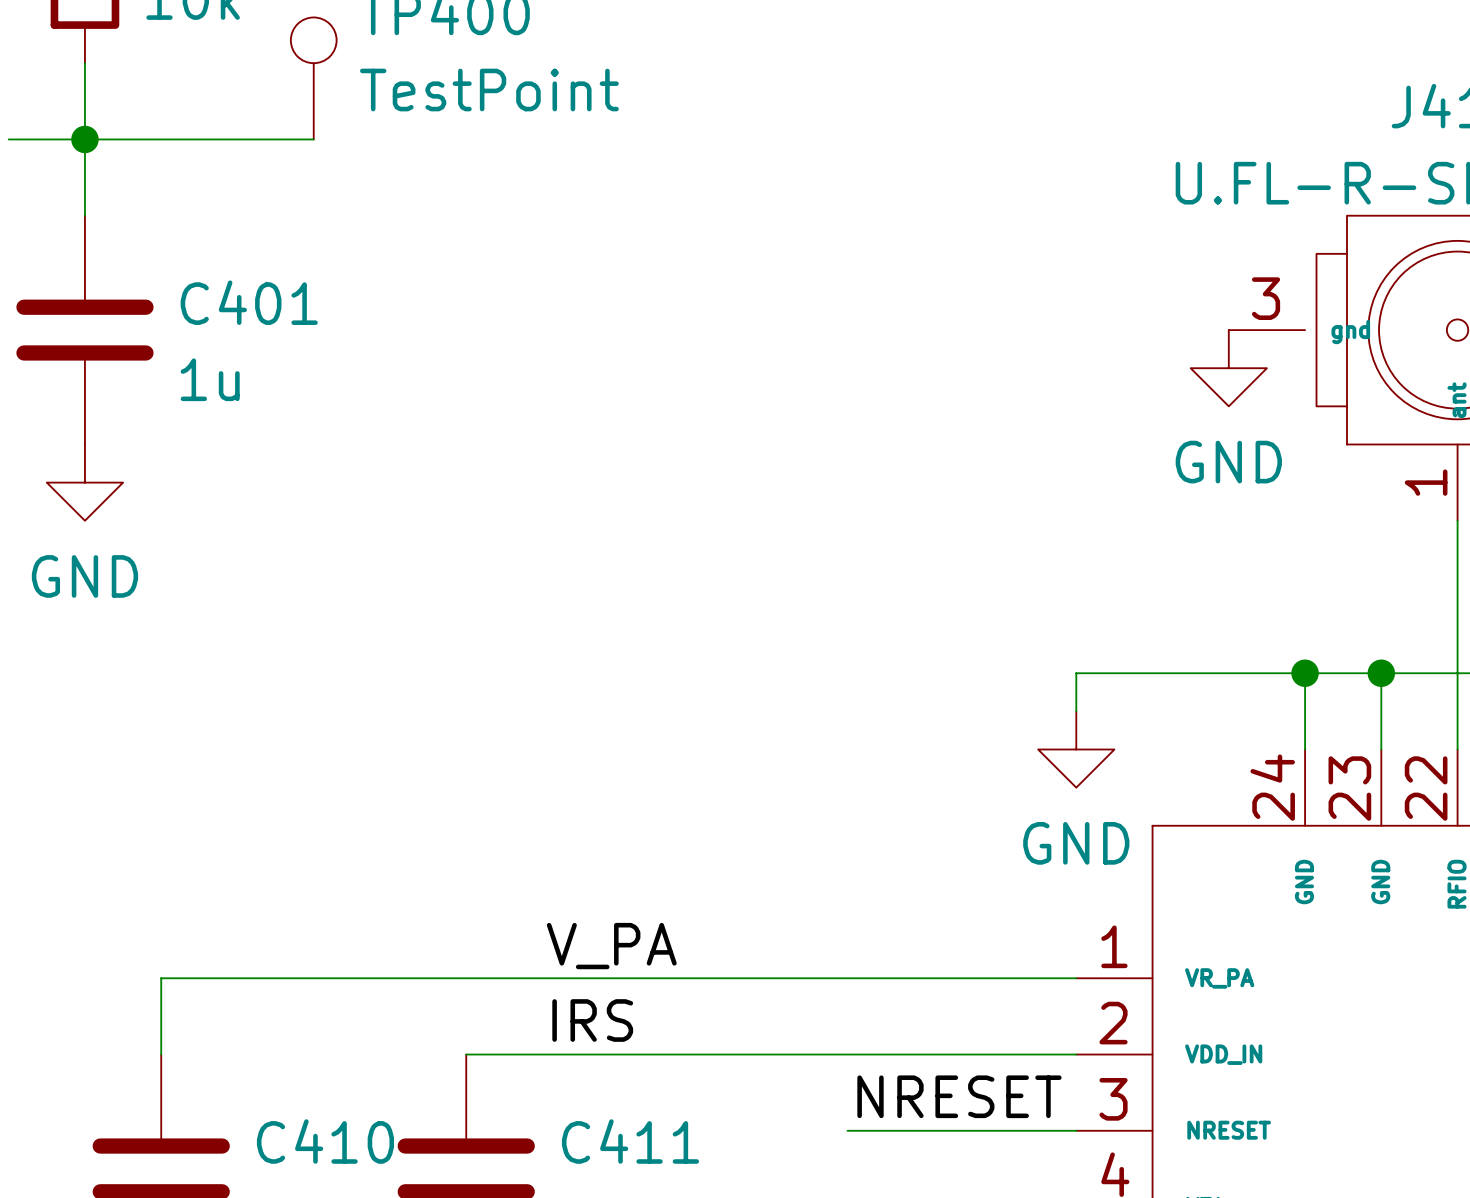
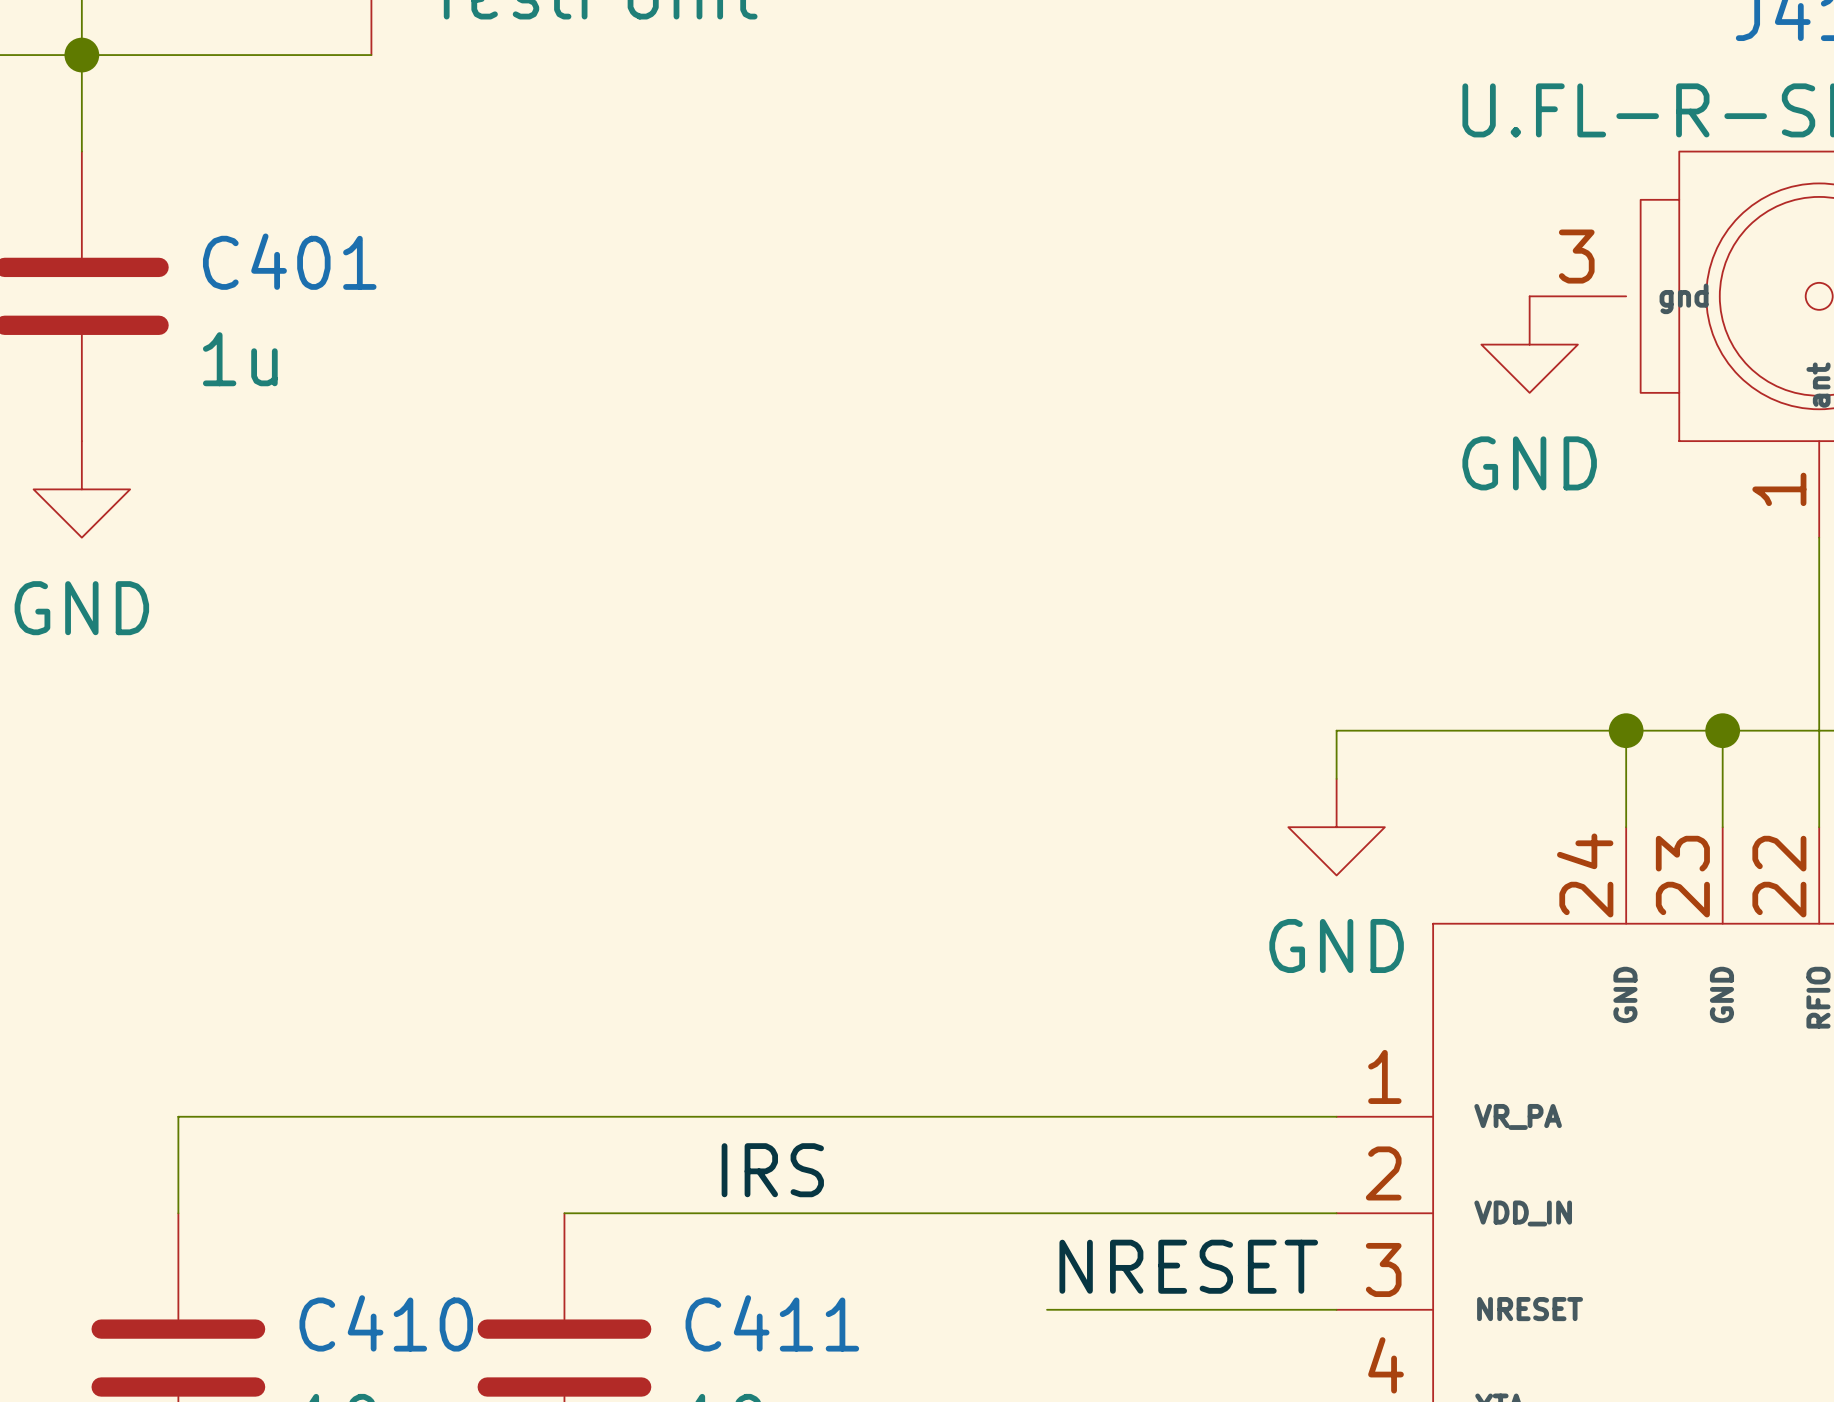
label: V_PA (611, 946) -> none
label position: IRS (592, 1020) -> IRS (772, 1170)

